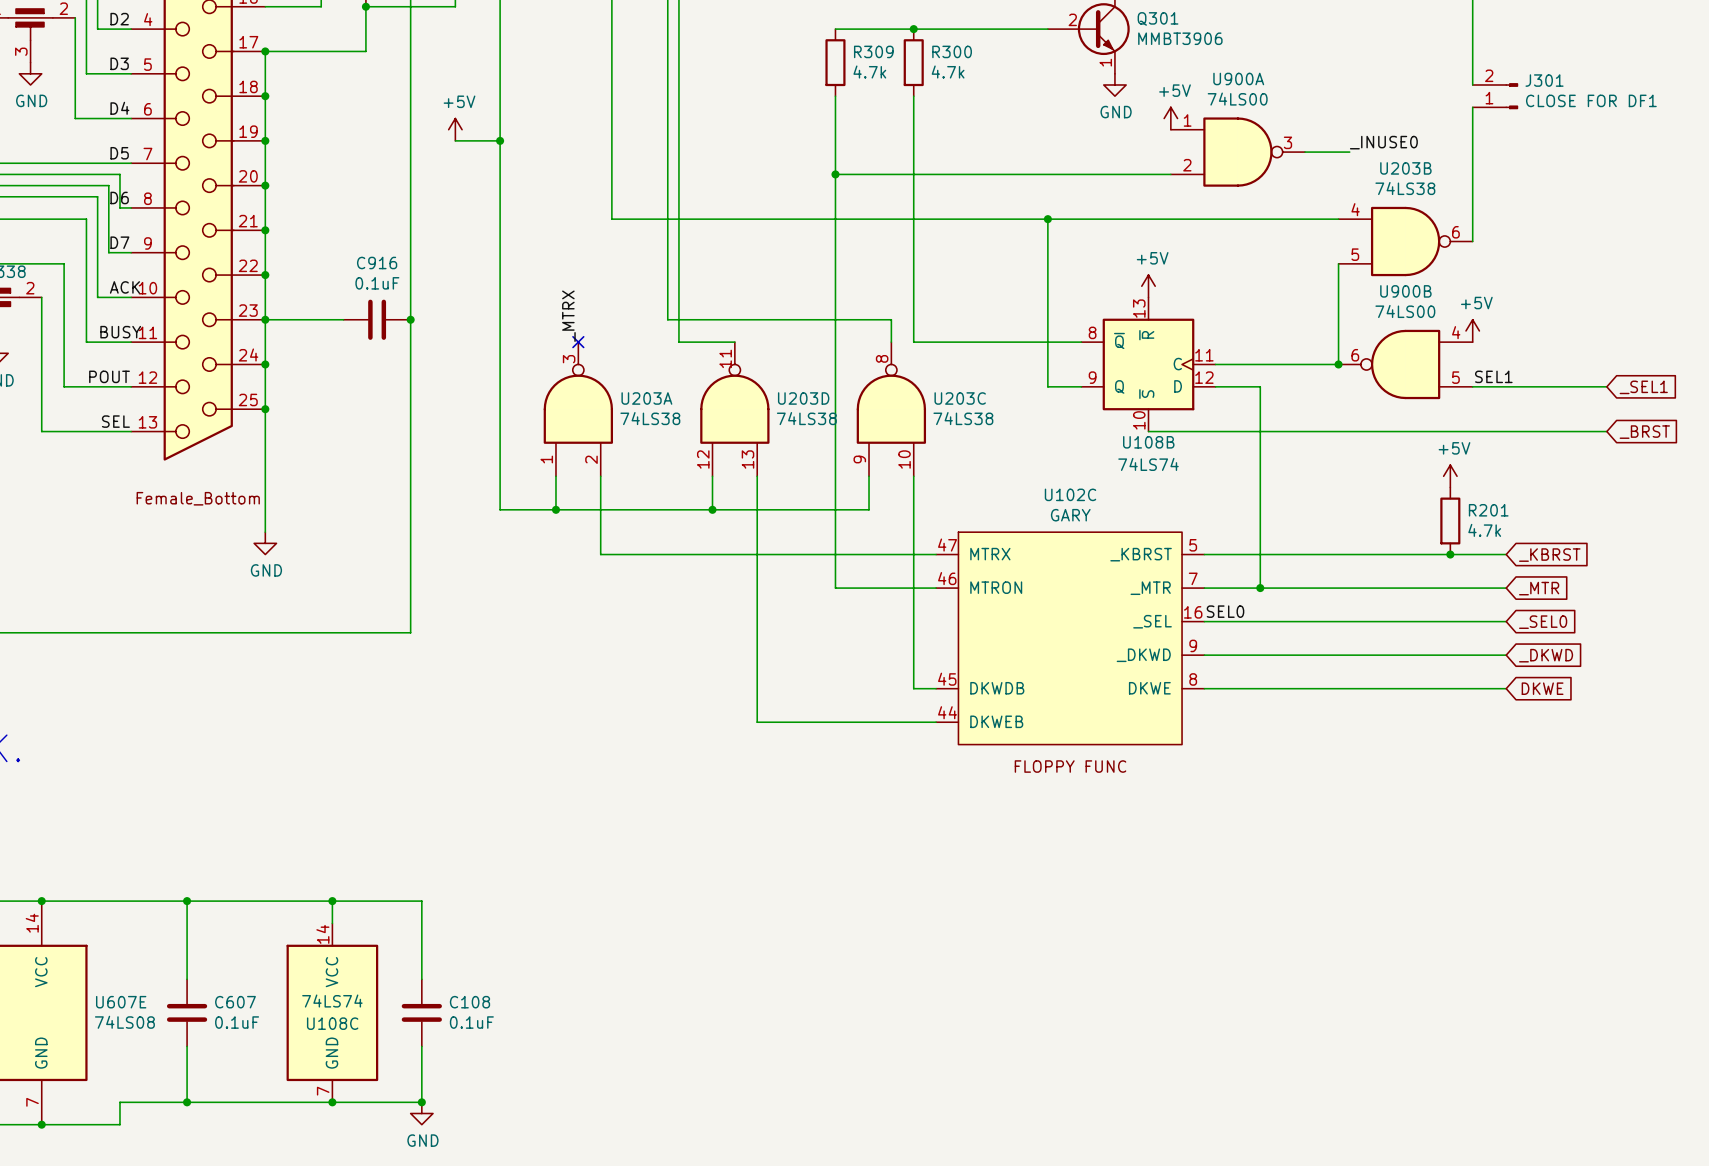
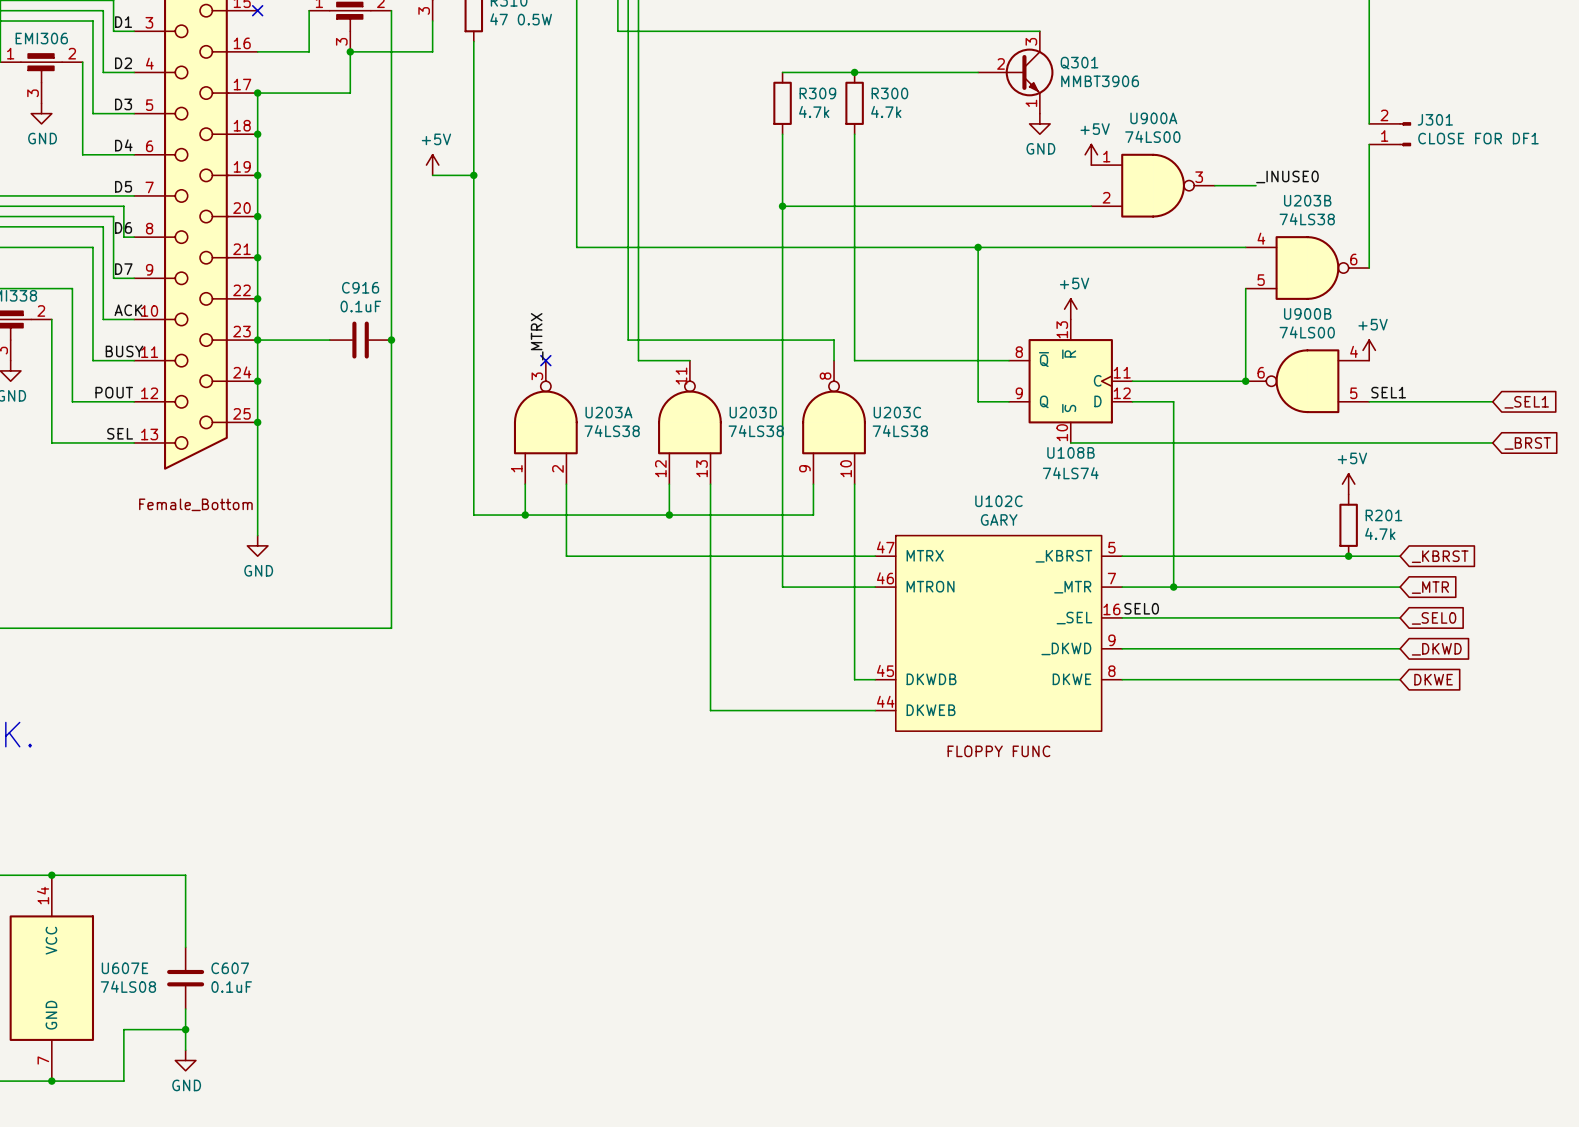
wire: (187, 901) (421, 901) (421, 979) -> none
junction: (187, 901) -> none
wire: (332, 901) (332, 923) -> none
junction: (332, 901) -> none
U108C: 74LS74 (332, 1012) -> none
C108: 0.1uF (421, 1012) -> none
wire: (421, 1046) (421, 1102) (119, 1102) -> (185, 1029) (123, 1029) (123, 1060)
power symbol: none -> GND (185, 1060)
junction position: (187, 1102) -> (185, 1029)
junction: (332, 1102) -> none
junction: (421, 1102) -> none
power symbol: GND (421, 1113) -> none

